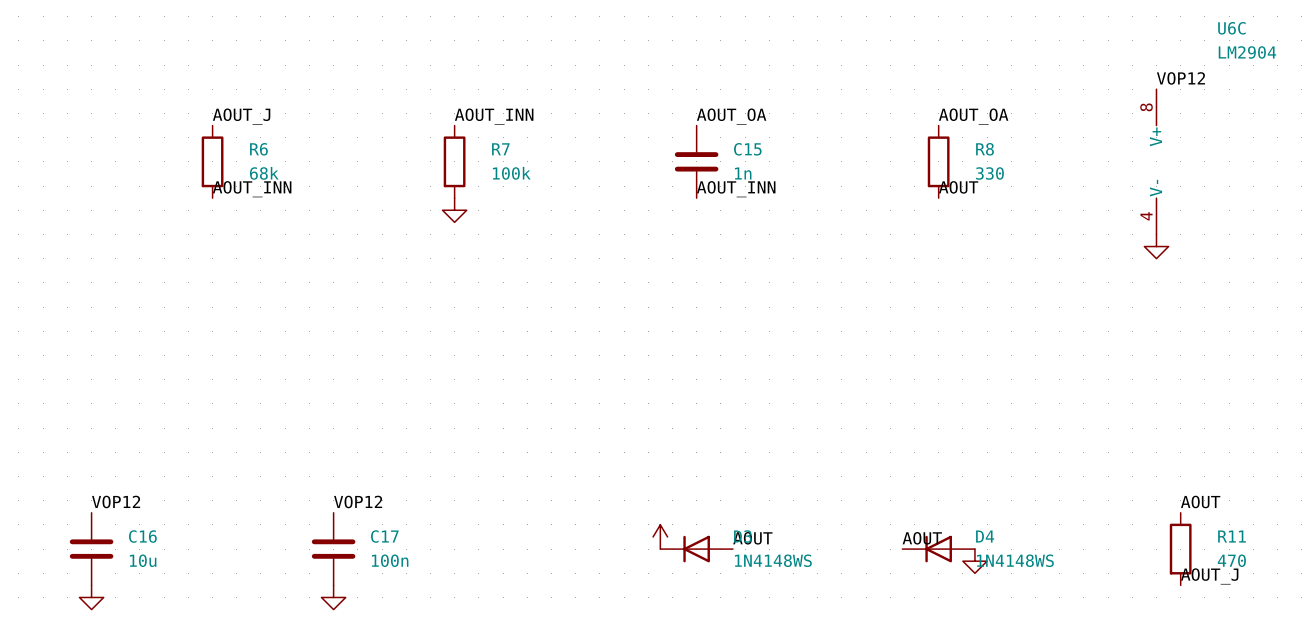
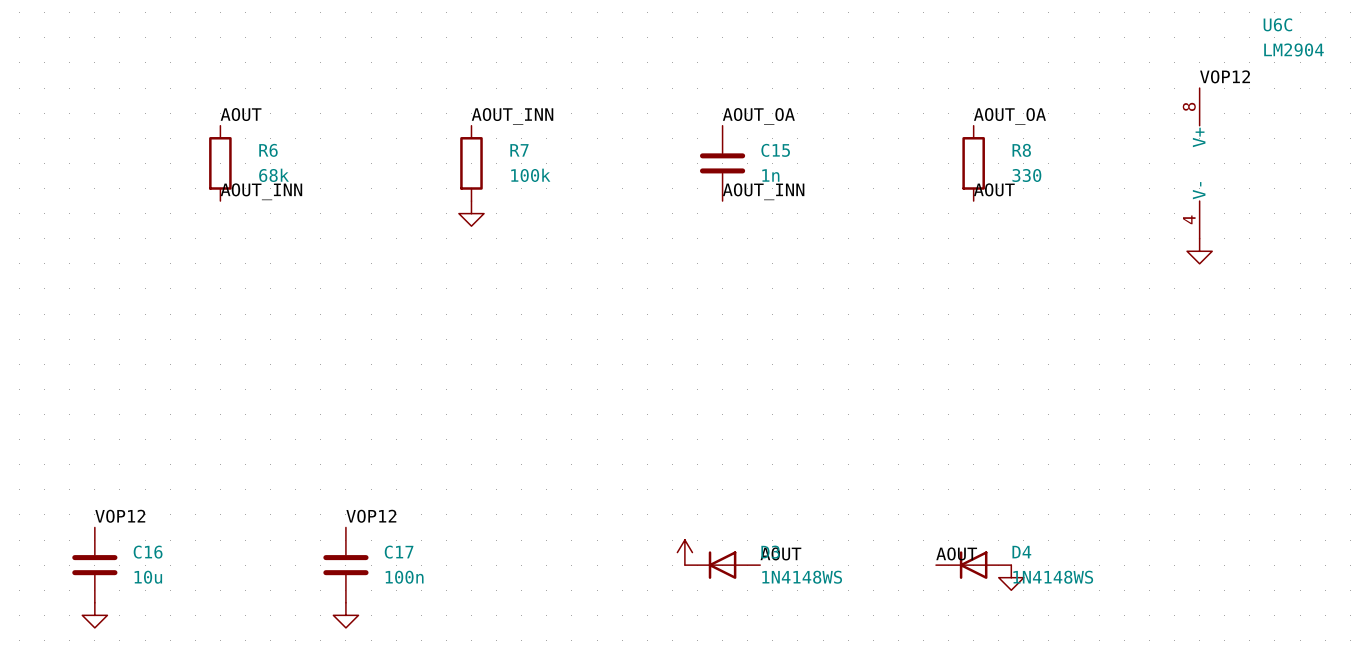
label: AOUT_J (241, 116) -> AOUT (241, 114)
label: AOUT (1200, 501) -> none
R11: 470 (1180, 549) -> none
label: AOUT_J (1209, 576) -> none

